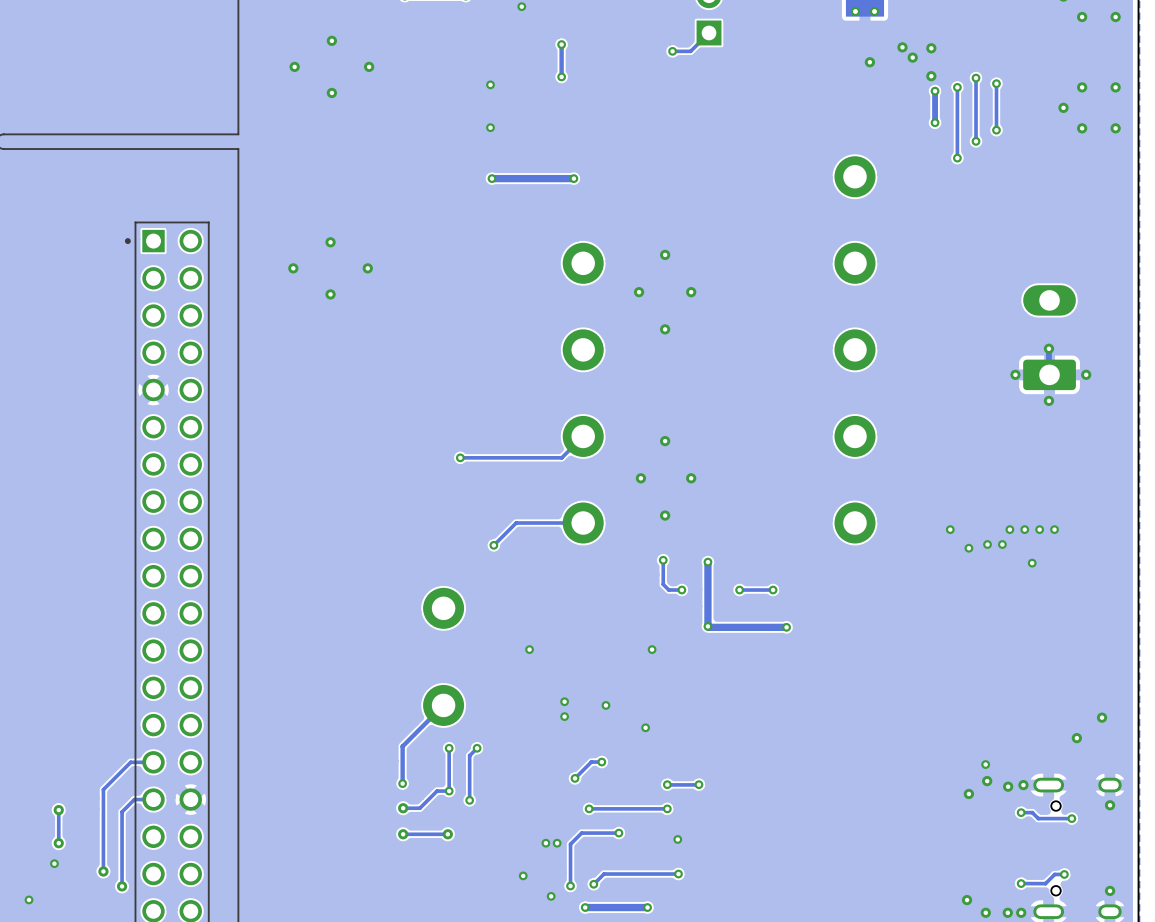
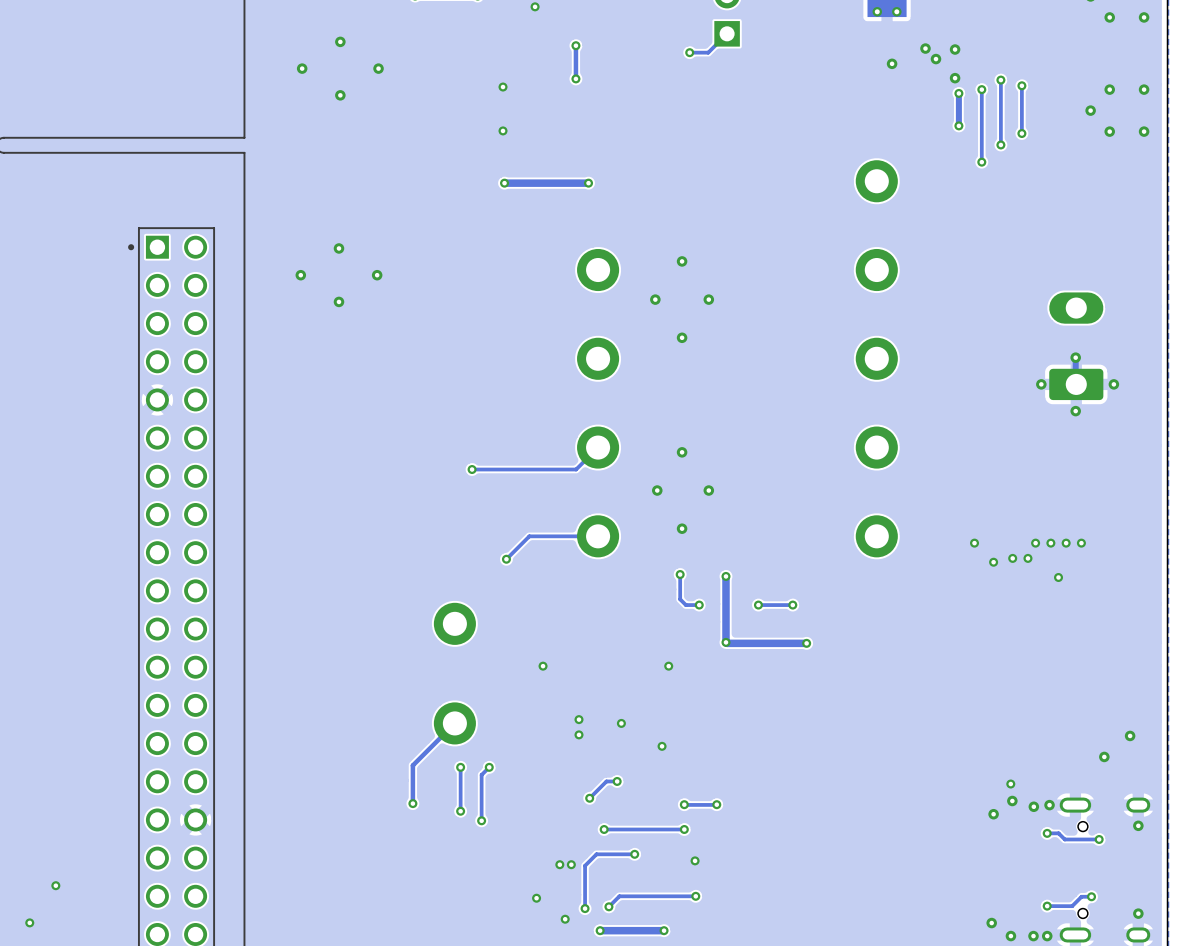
track: (153, 762) (130, 762) (103, 789) (103, 871) -> none
track: (449, 791) (437, 791) (419, 808) (403, 808) -> none
track: (153, 799) (134, 799) (122, 811) (122, 886) -> none
via: (403, 808) -> none
track: (58, 810) (58, 843) -> none
via: (58, 810) -> none
via: (403, 834) -> none
track: (447, 834) (403, 834) -> none
via: (447, 834) -> none
via: (58, 843) -> none
via: (103, 871) -> none
via: (122, 886) -> none

